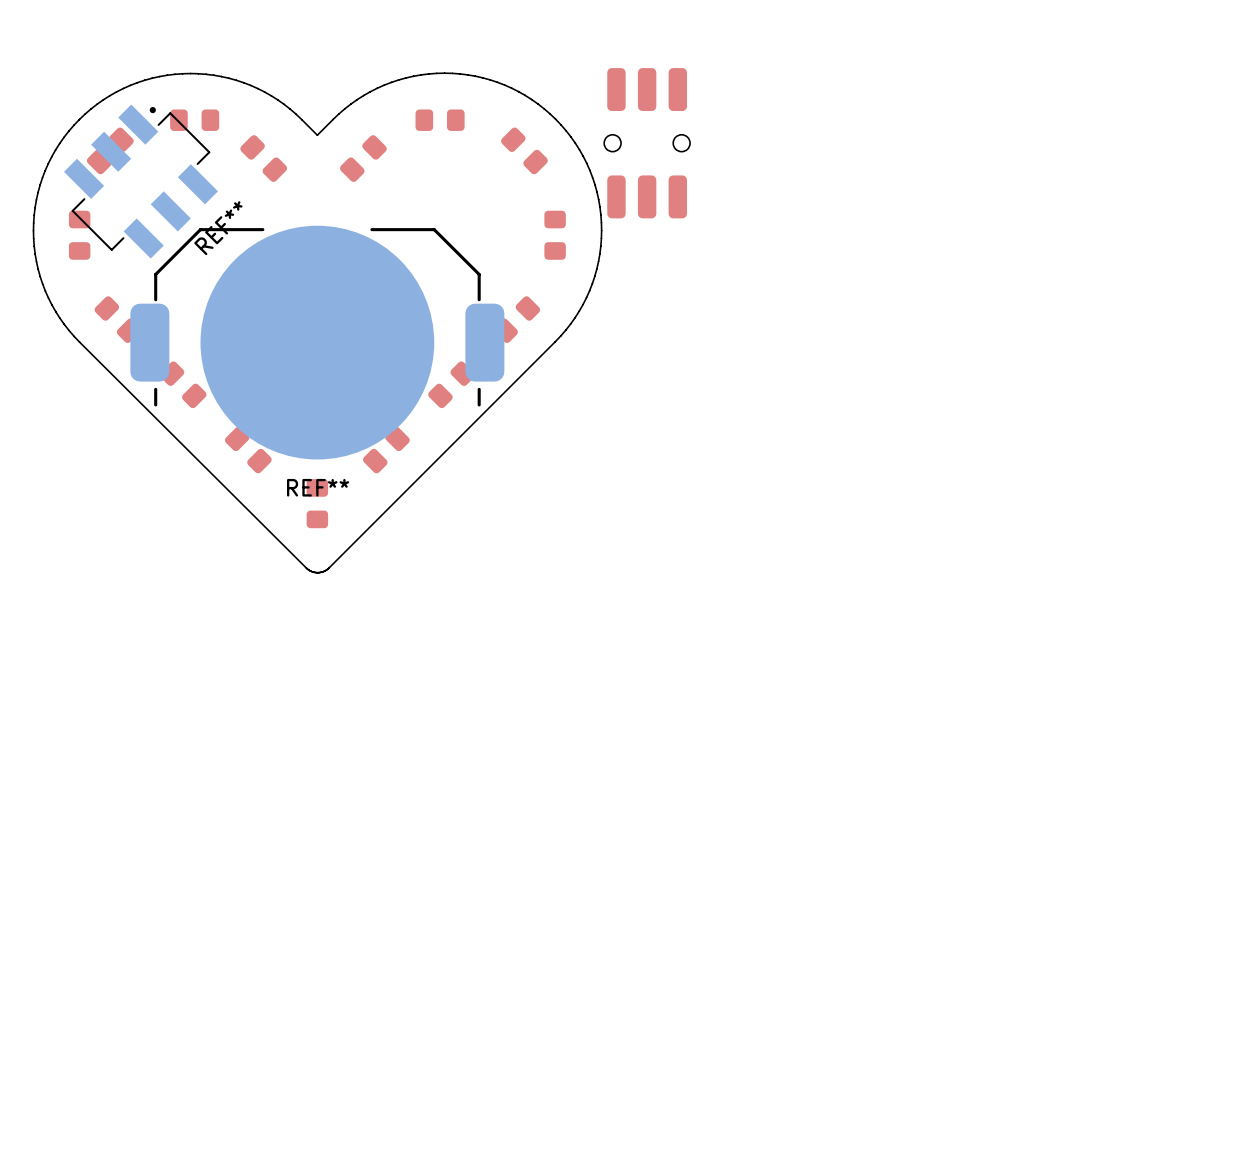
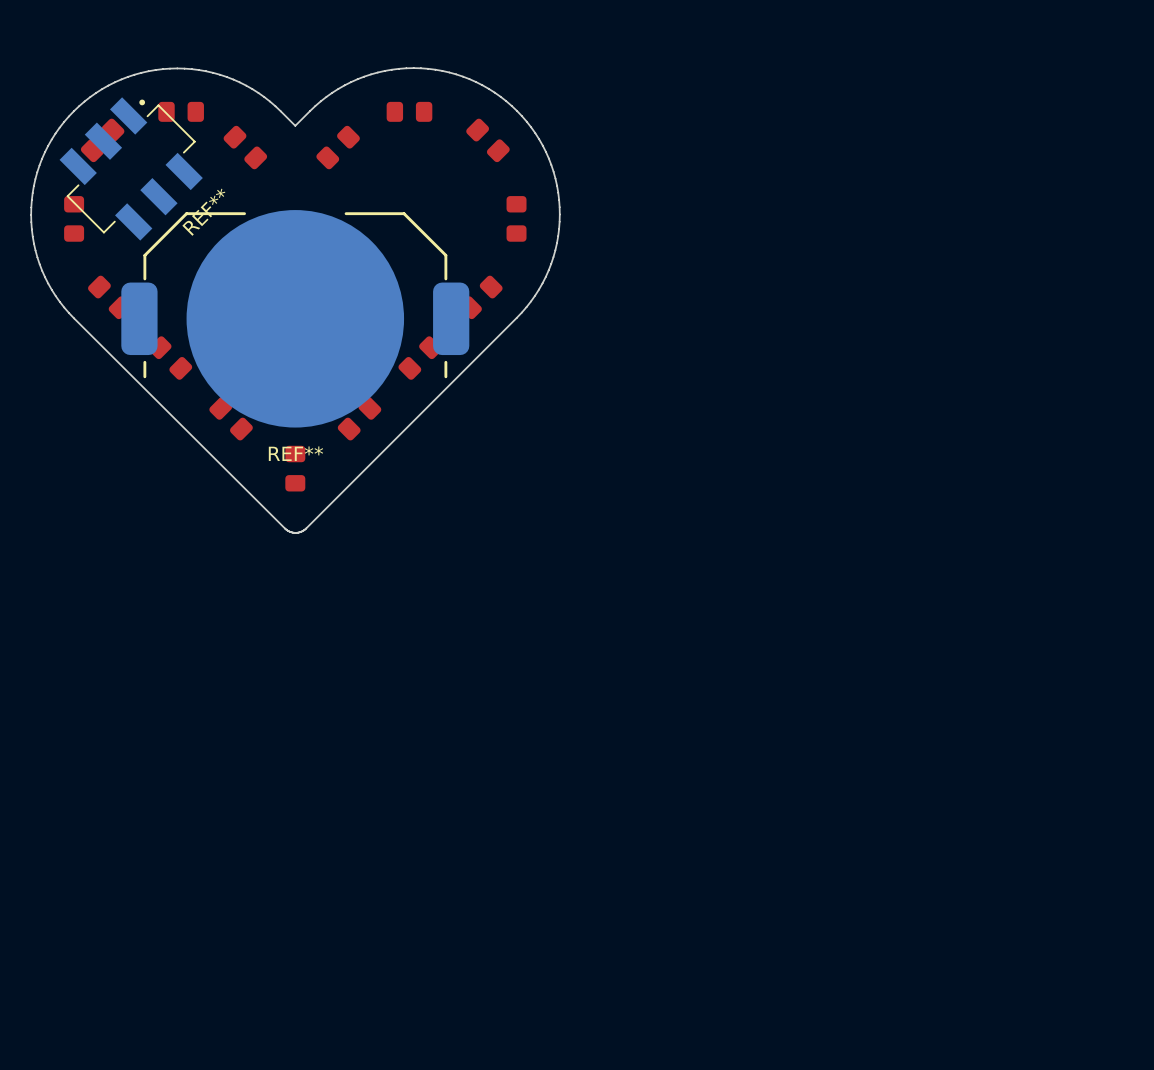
part: (647, 143) -> none

